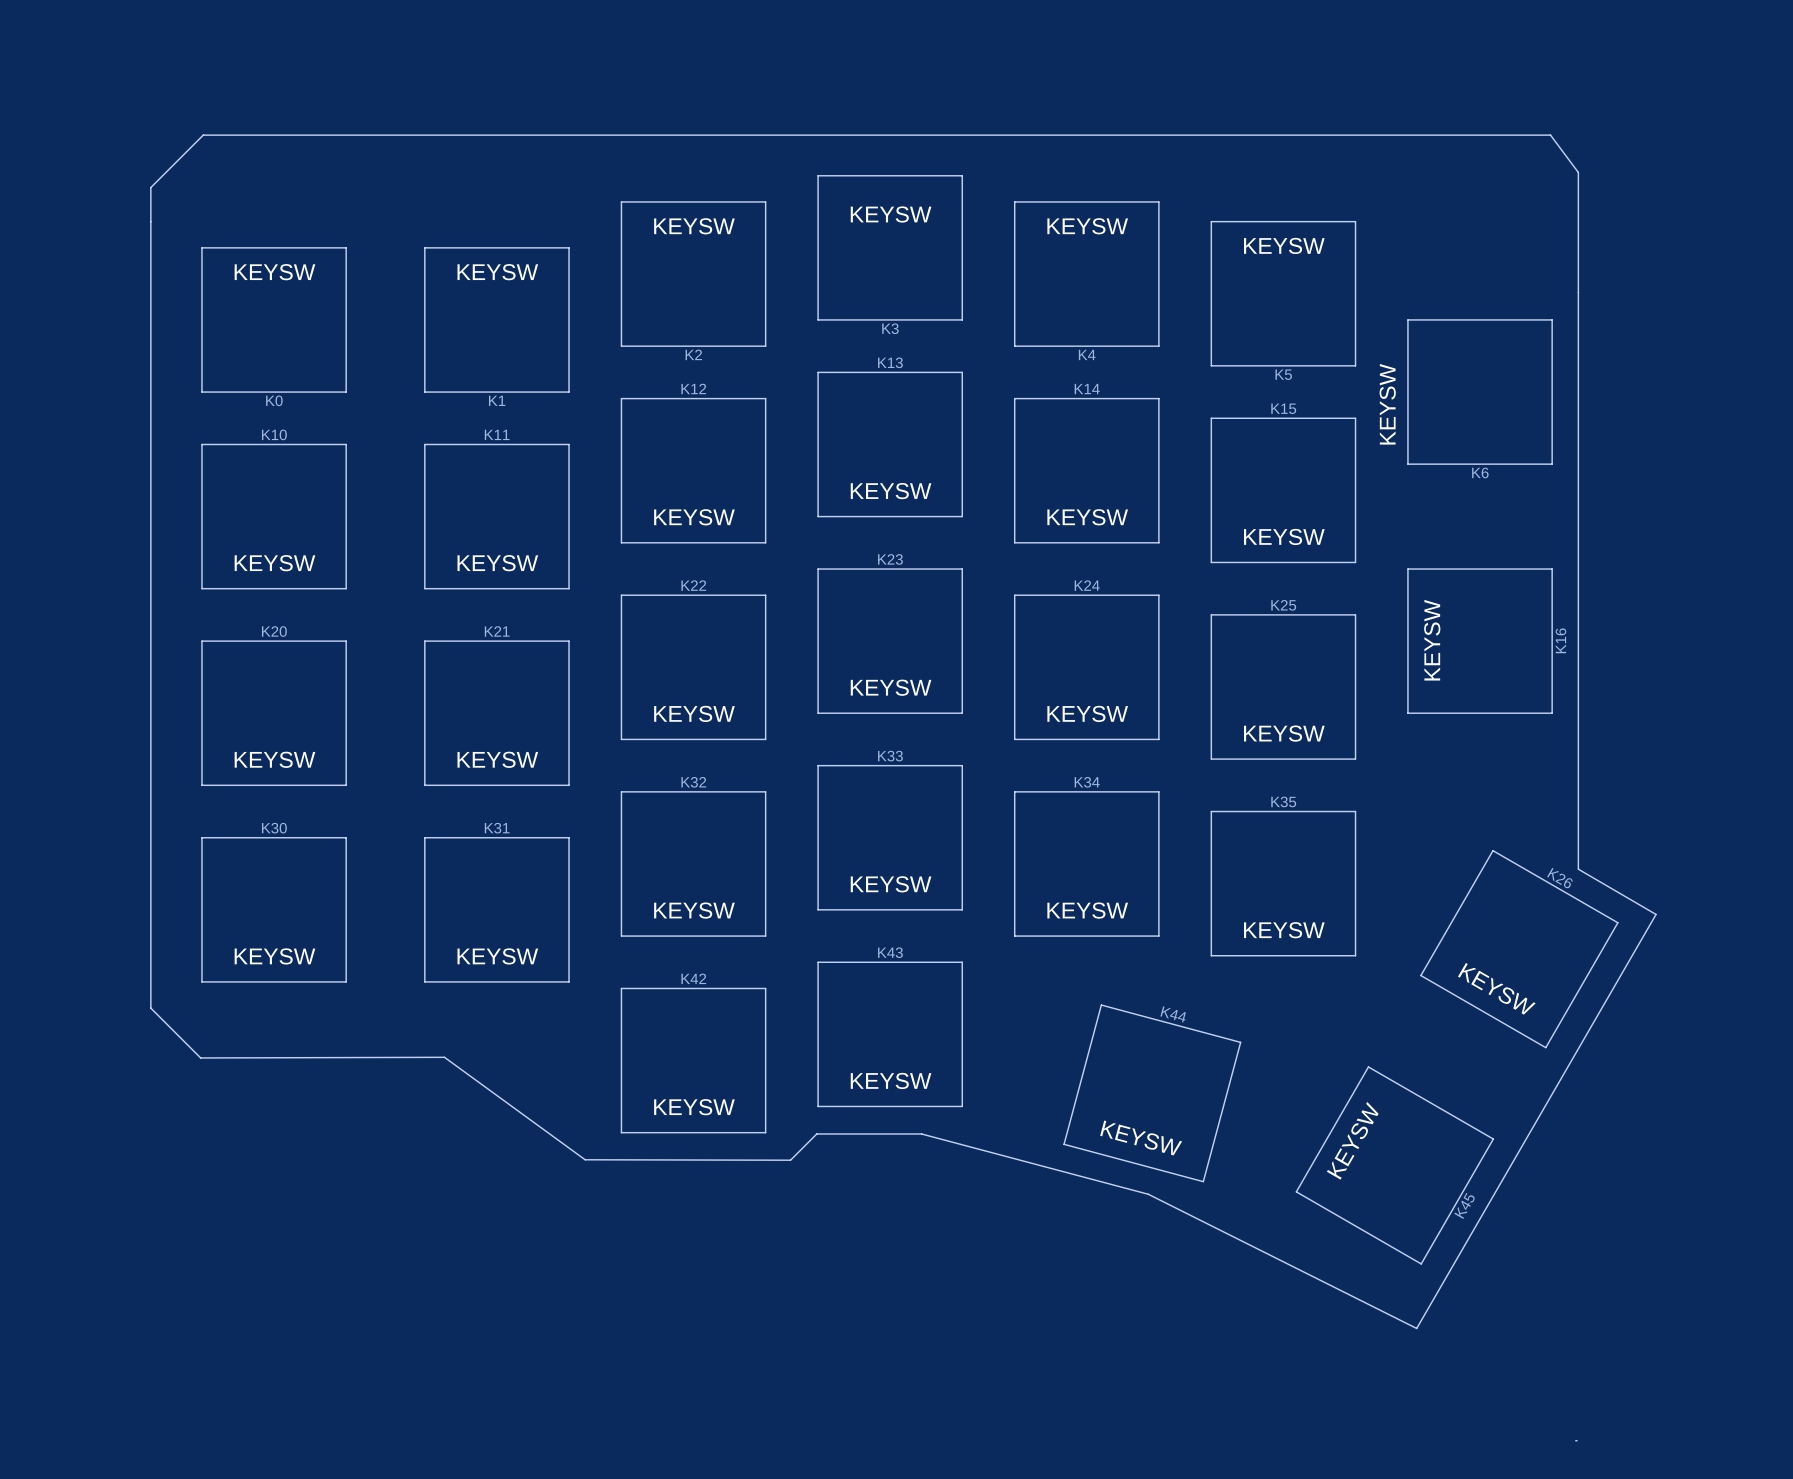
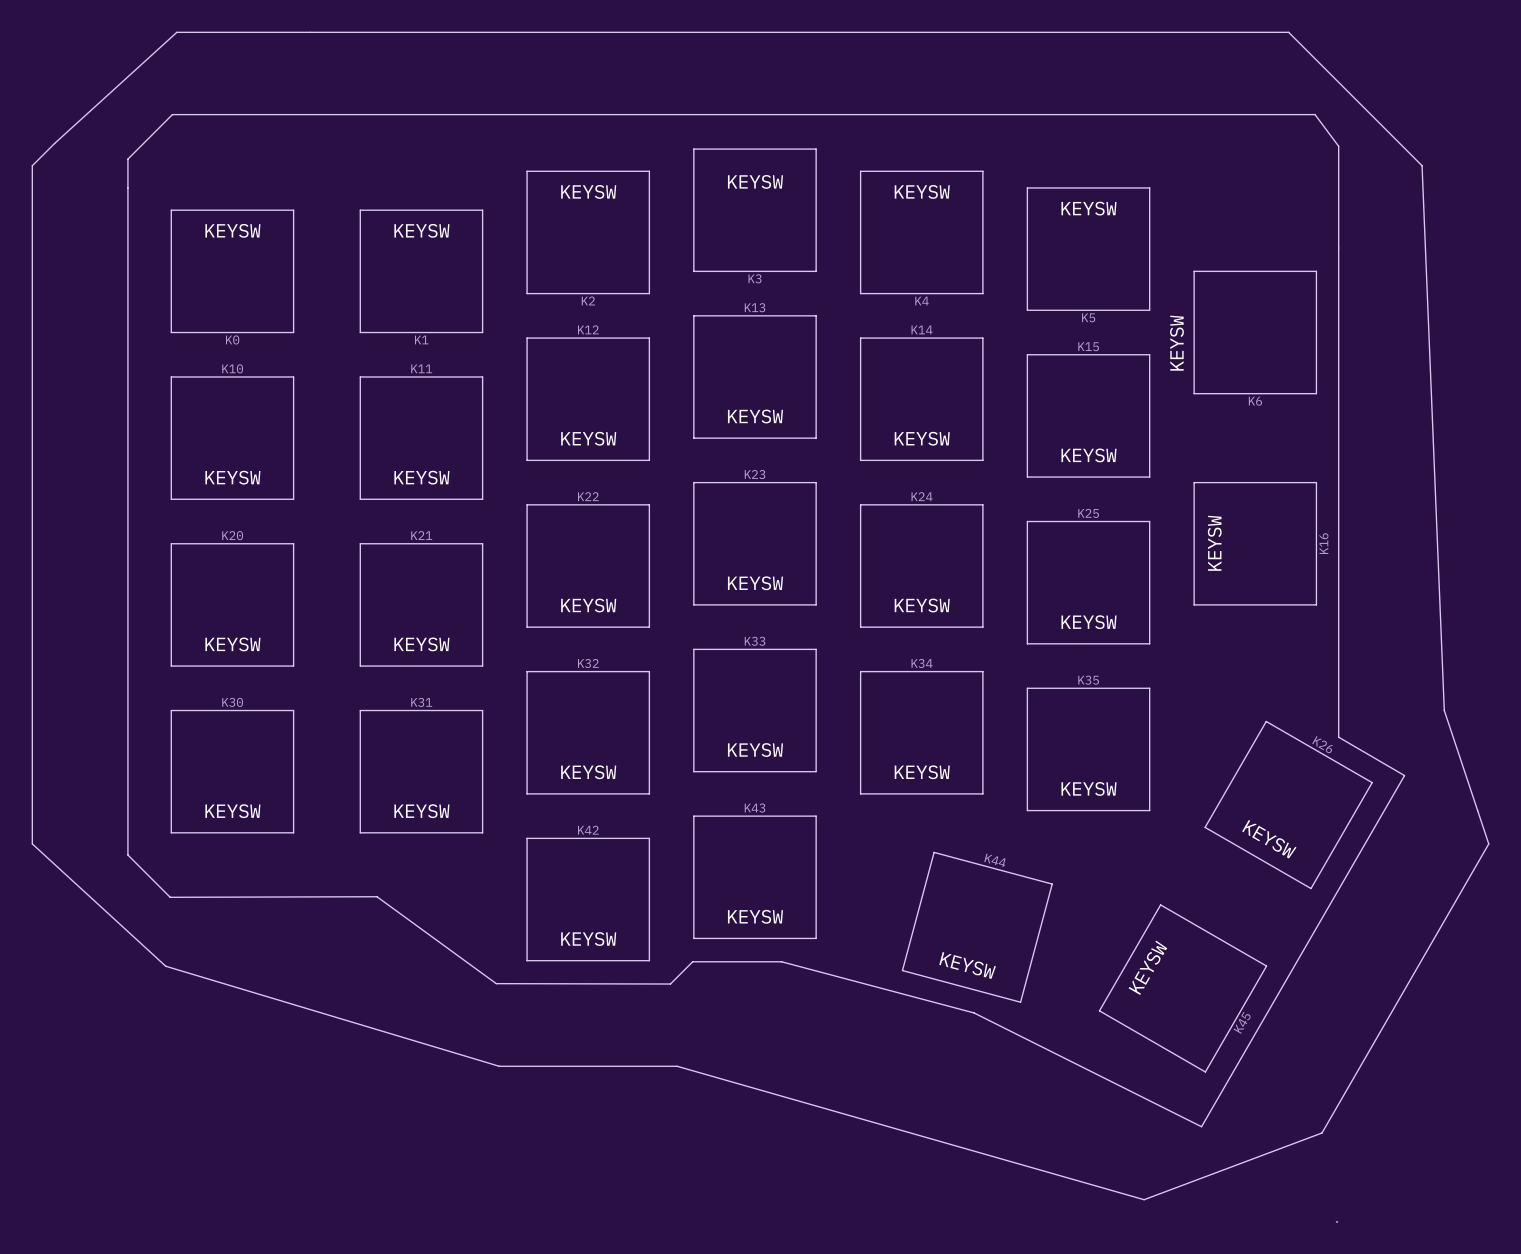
board edge: none -> (176, 32) (32, 165) (32, 843) (165, 966) (499, 1066) (677, 1066) (1144, 1199) (1322, 1132) (1488, 843) (1444, 710) (1422, 165) (1288, 32) (176, 32)

